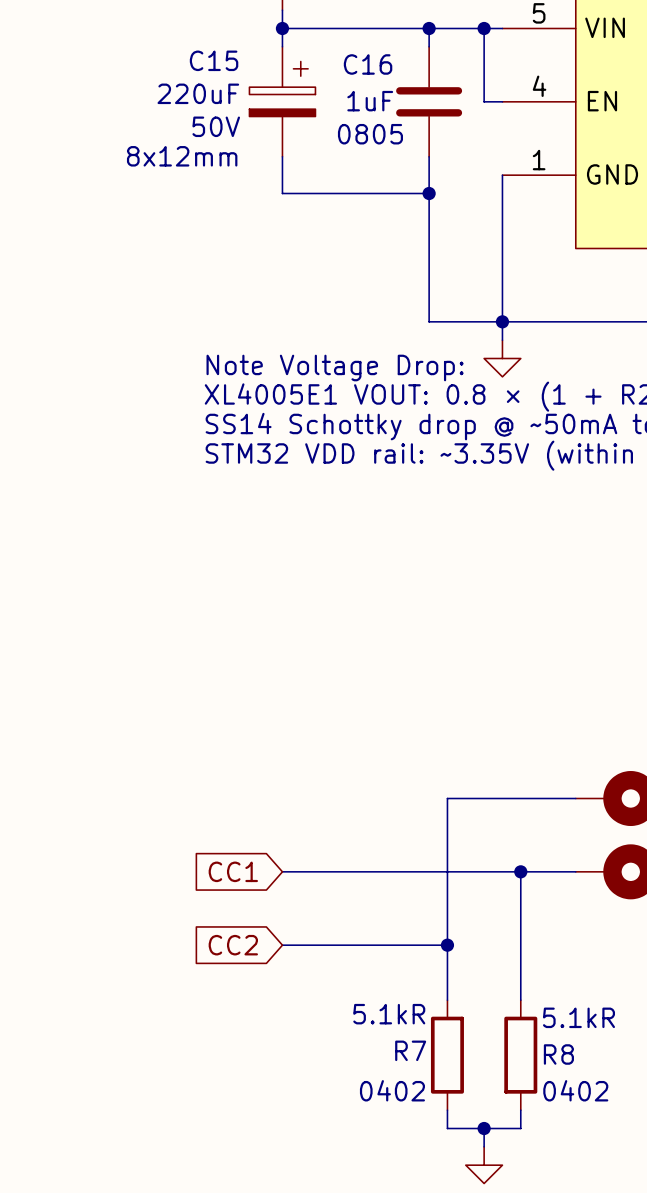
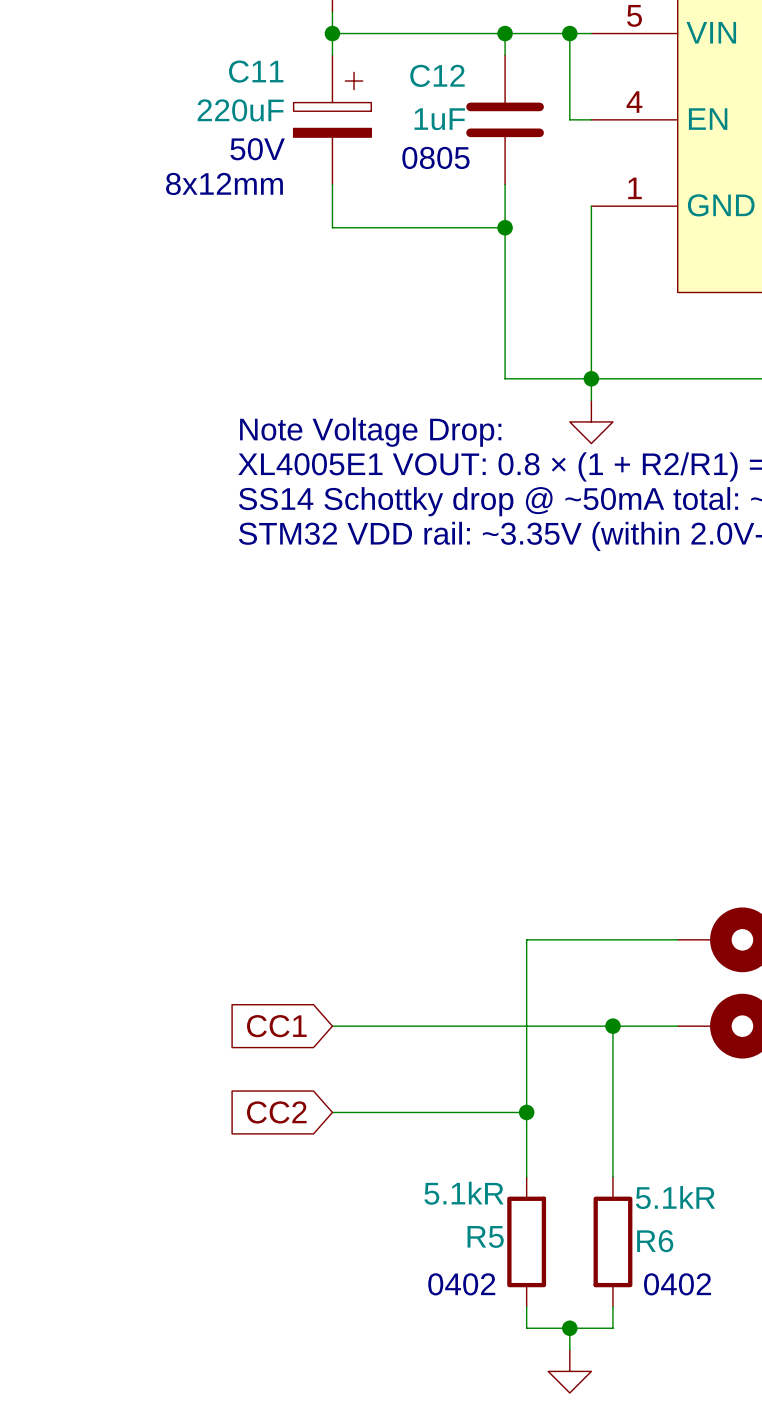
C15 name: C15 (214, 60) -> C11 (256, 71)
C16 name: C16 (368, 64) -> C12 (437, 75)
R7 name: R7 (410, 1050) -> R5 (485, 1236)
R8 name: R8 (558, 1054) -> R6 (655, 1241)

